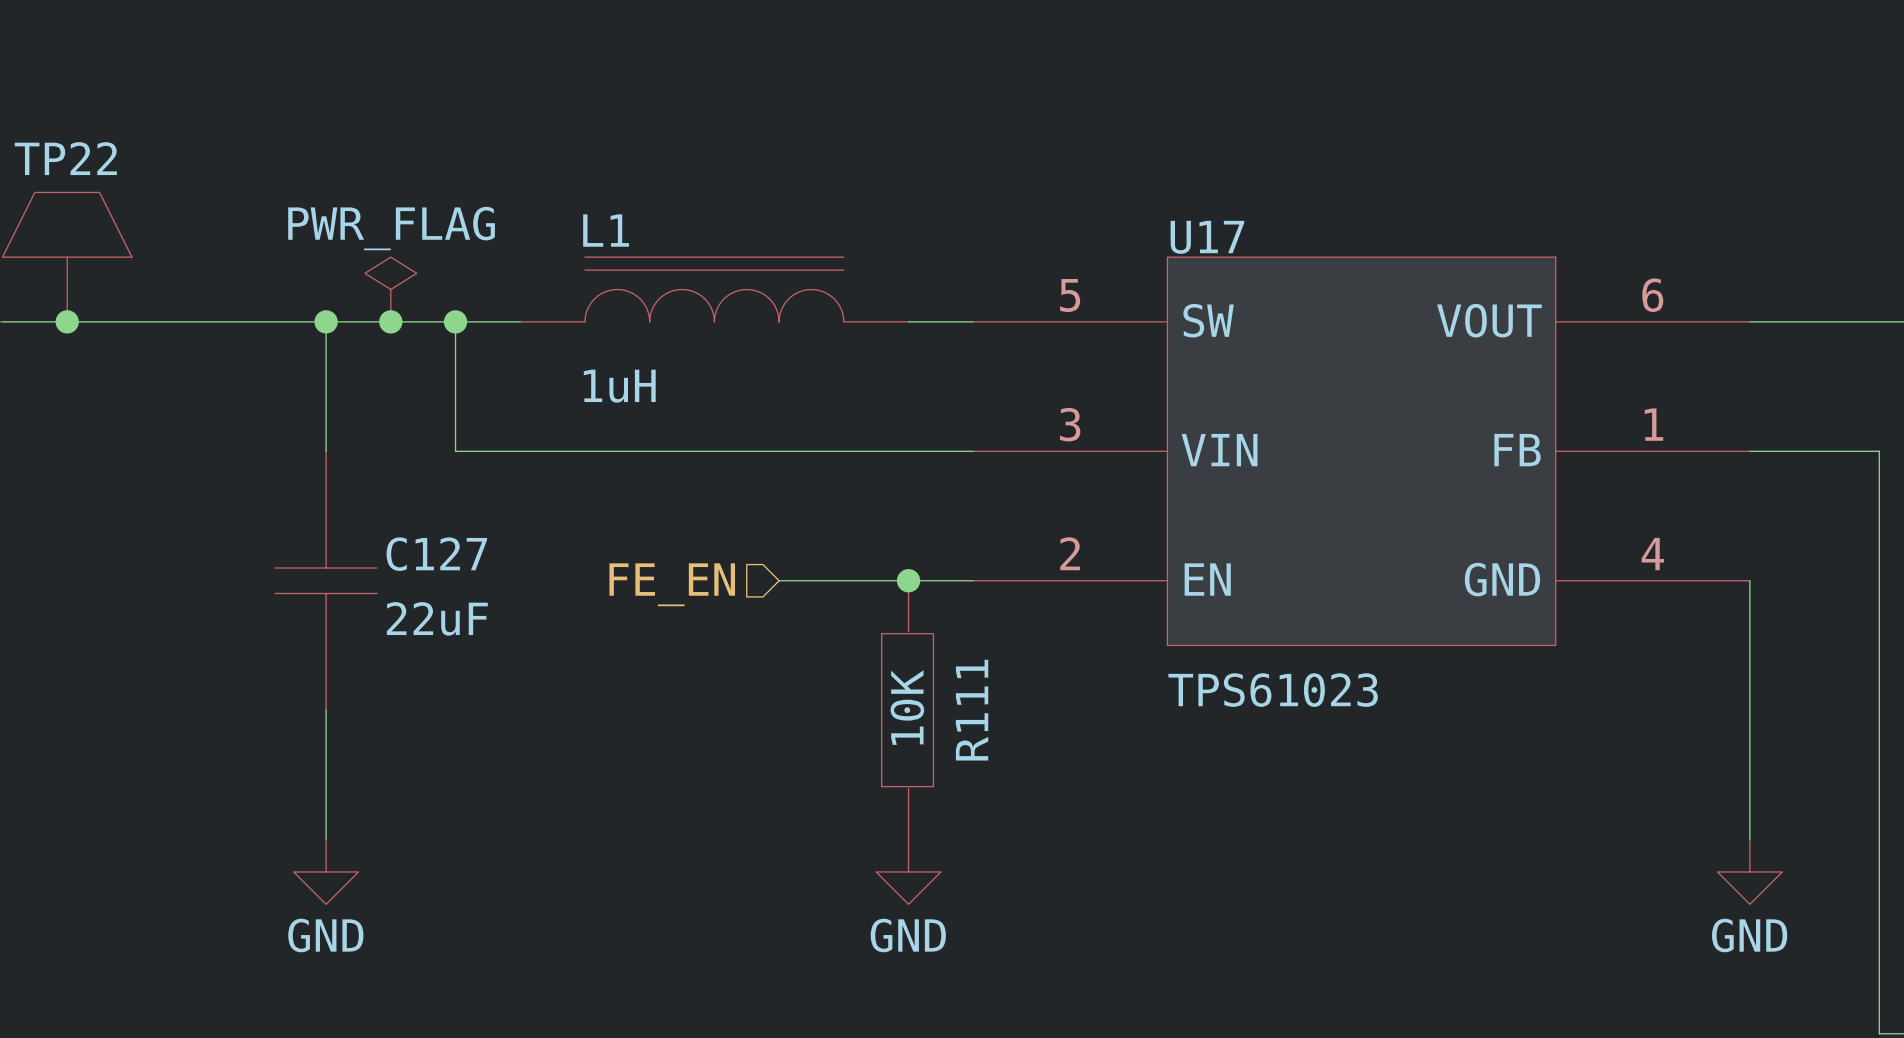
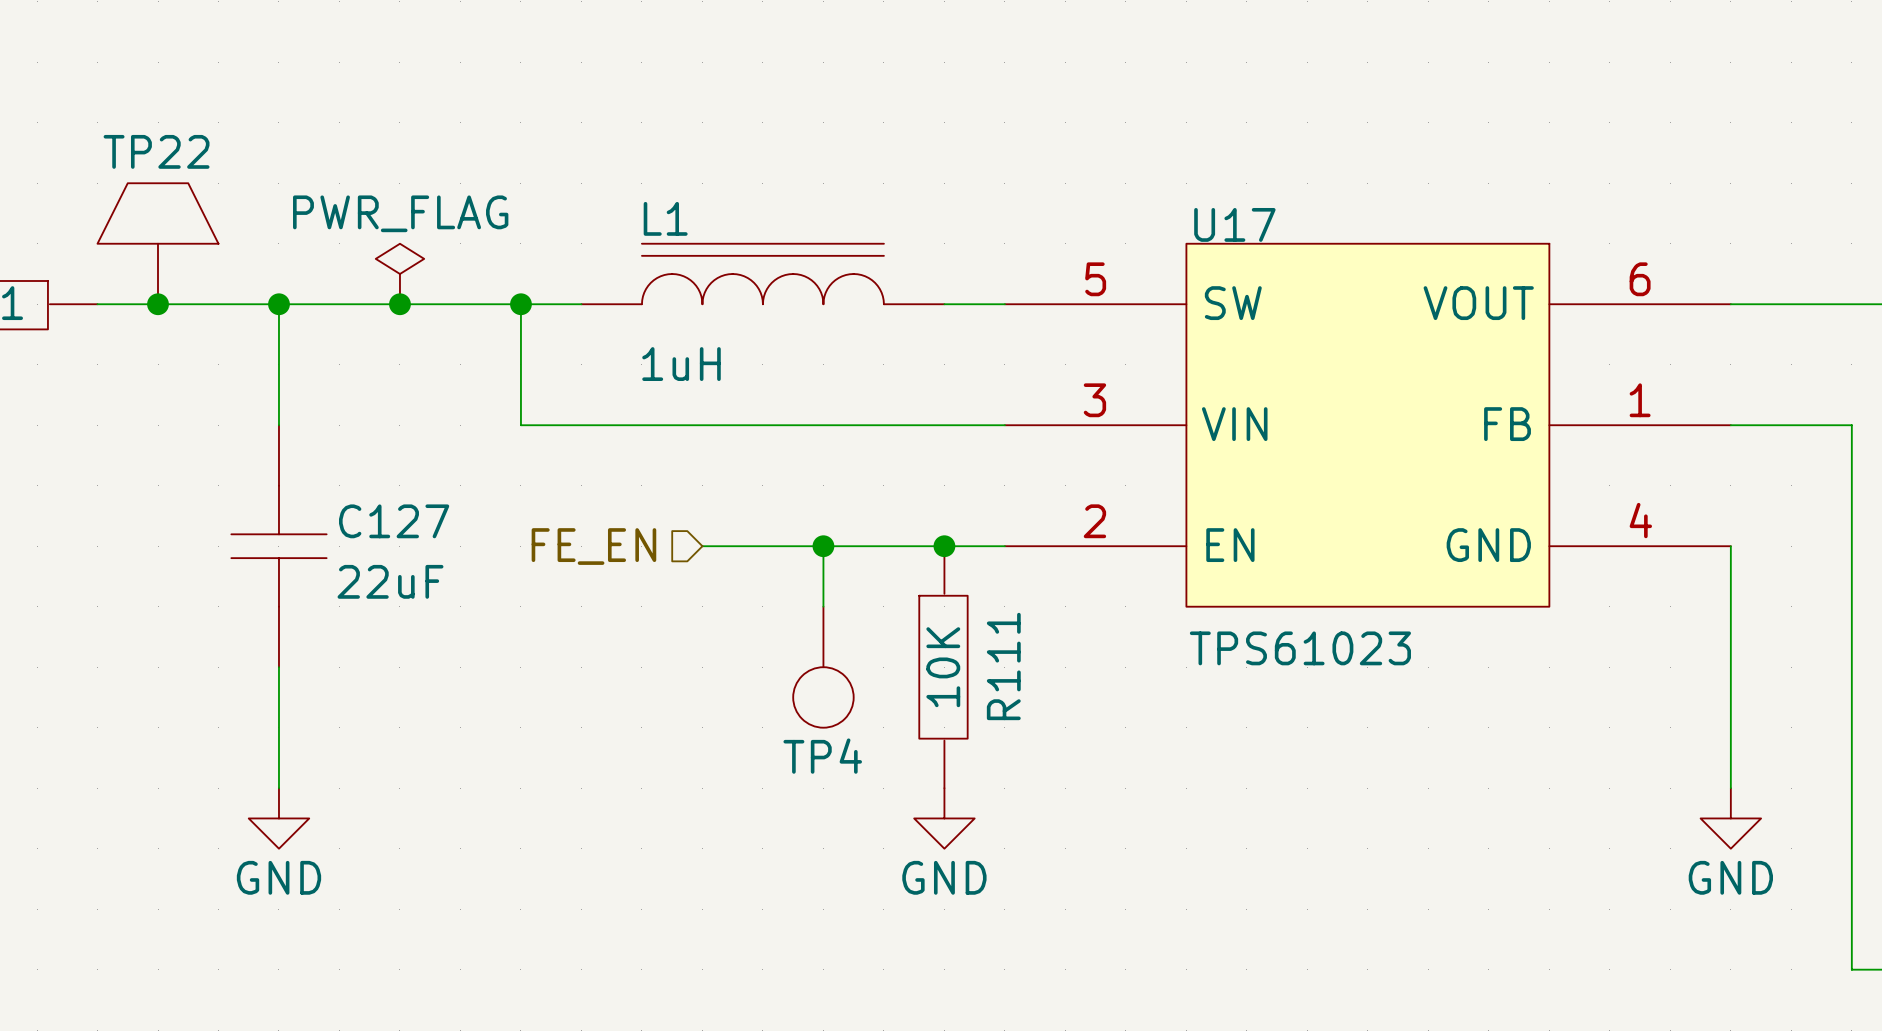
power symbol position: PWR_FLAG (390, 289) -> PWR_FLAG (399, 273)
junction: none -> (278, 304)
wire: (326, 321) (326, 451) -> (278, 304) (278, 425)
junction: (390, 321) -> none
C127 position: (326, 580) -> (278, 546)
wire: none -> (702, 546) (823, 546) (823, 606)
junction: none -> (823, 546)
hierarchical label position: FE_EN (672, 584) -> FE_EN (593, 546)
wire: (326, 710) (326, 839) -> (278, 667) (278, 788)
TP4: none -> (823, 667)
power symbol position: GND (326, 871) -> GND (278, 818)

